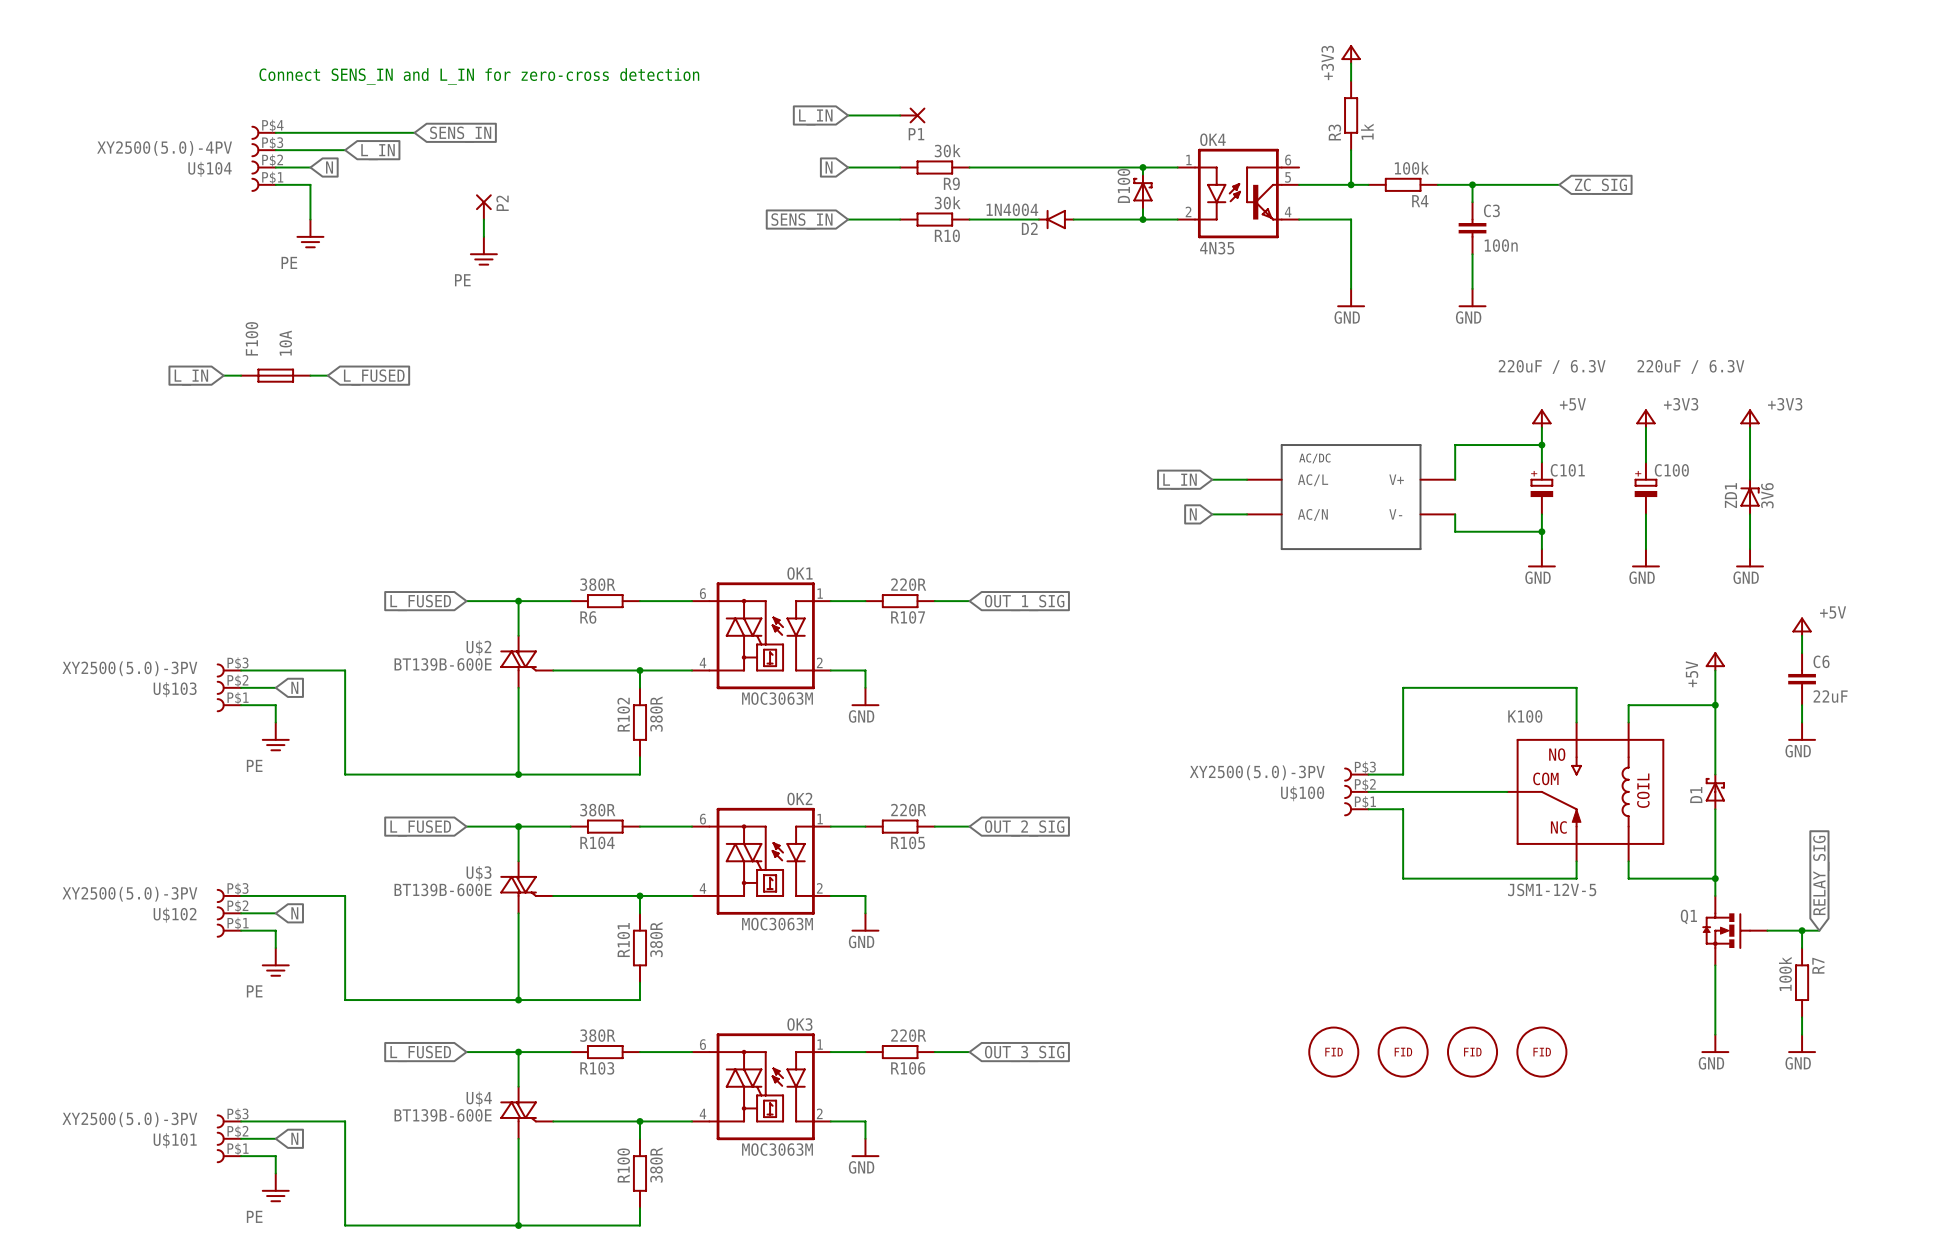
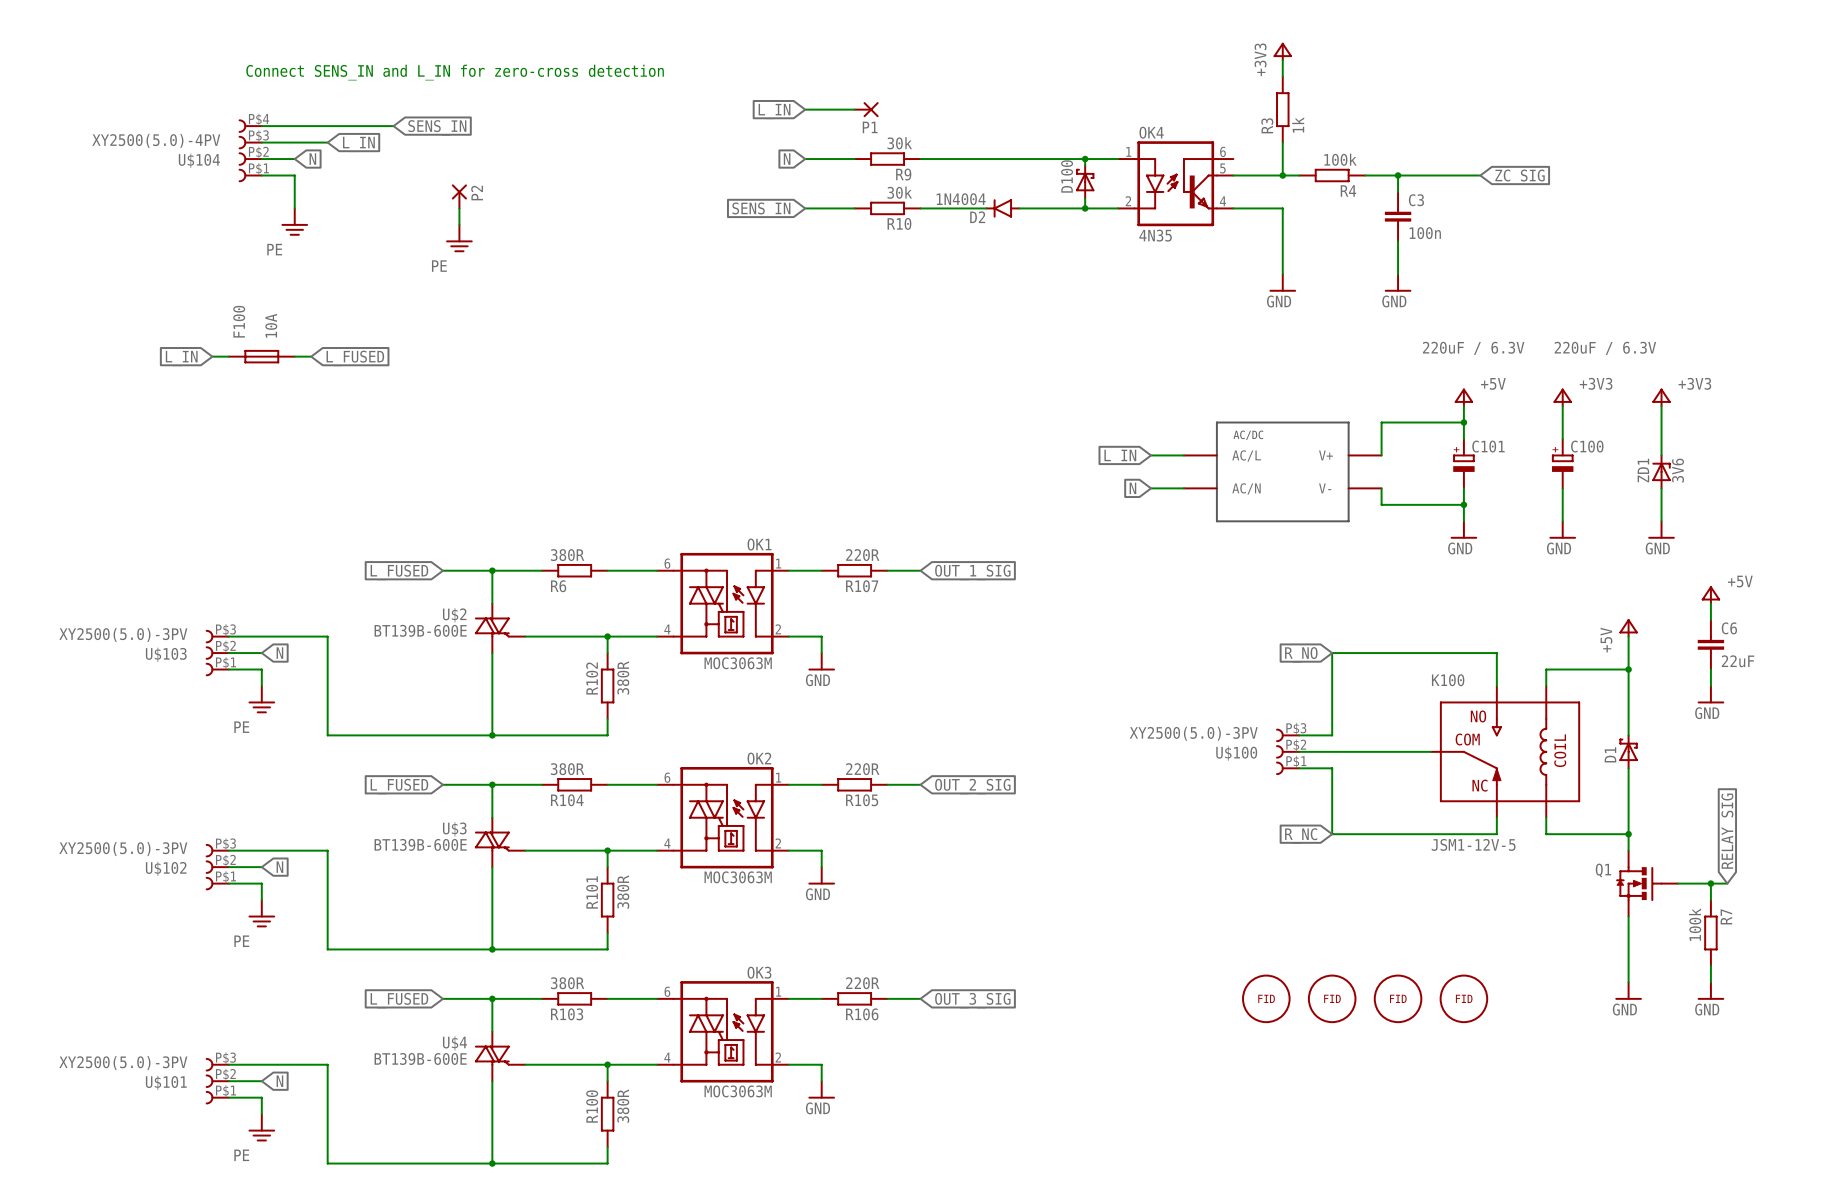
global label: none -> R_NO (1301, 654)
global label: none -> R_NC (1301, 835)

